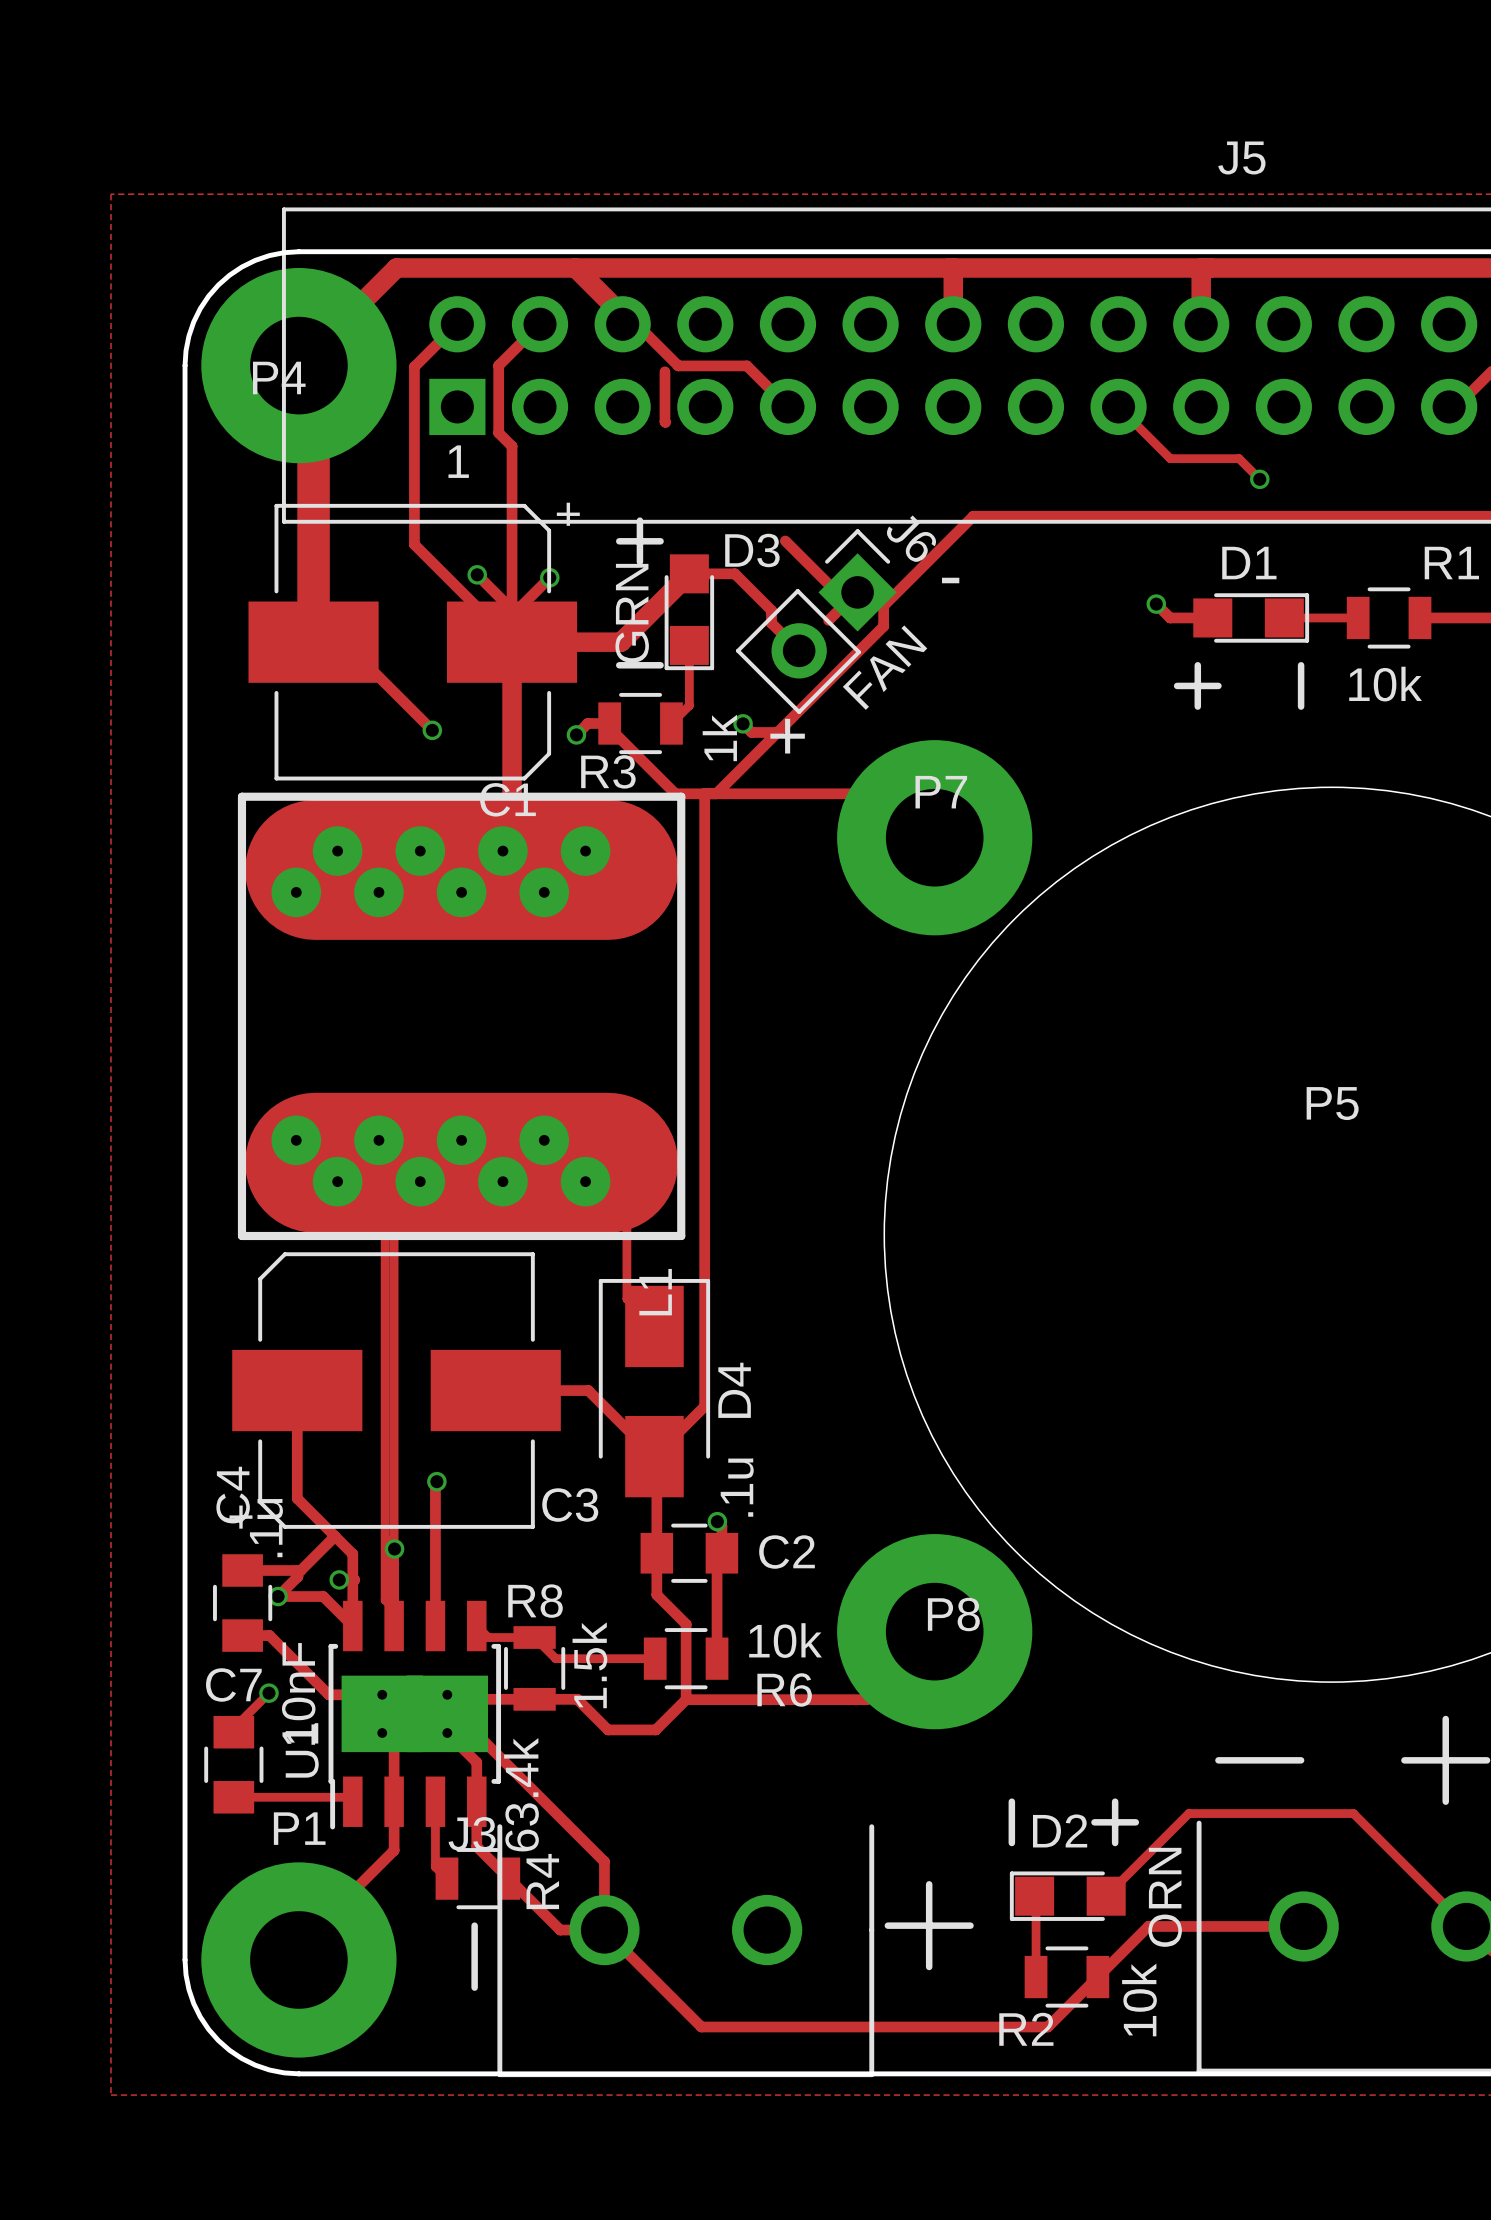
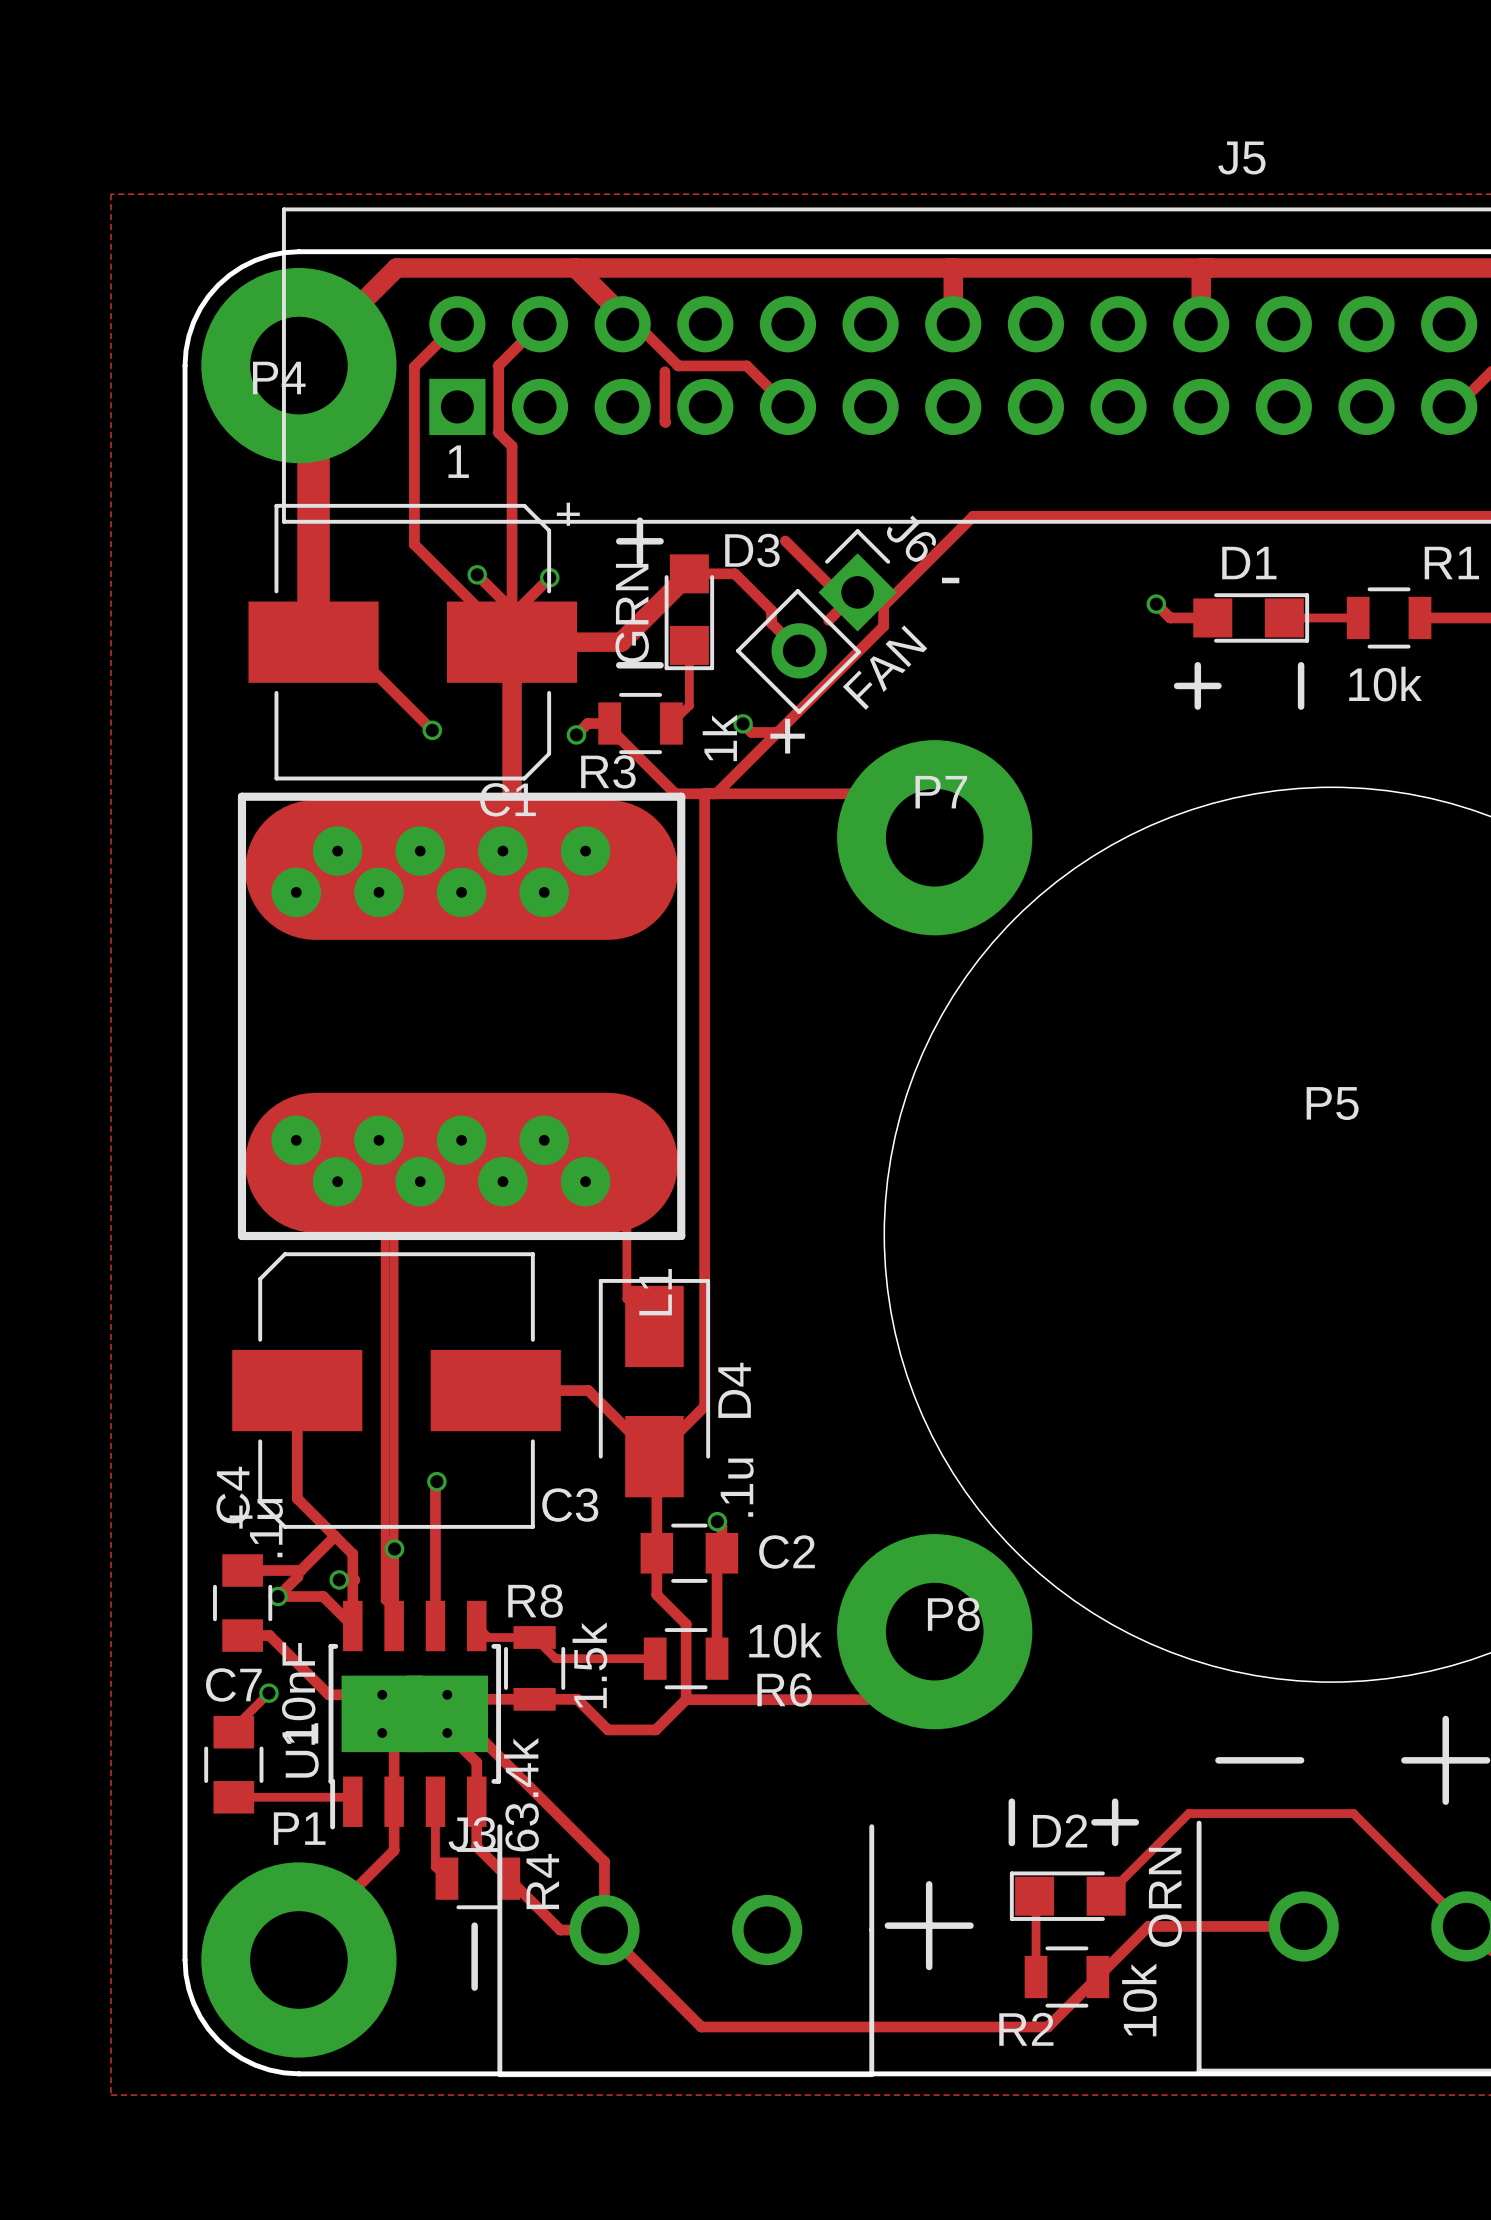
track: (1118, 406) (1170, 458) (1239, 458) (1259, 479) -> none
via: (1259, 479) -> none

